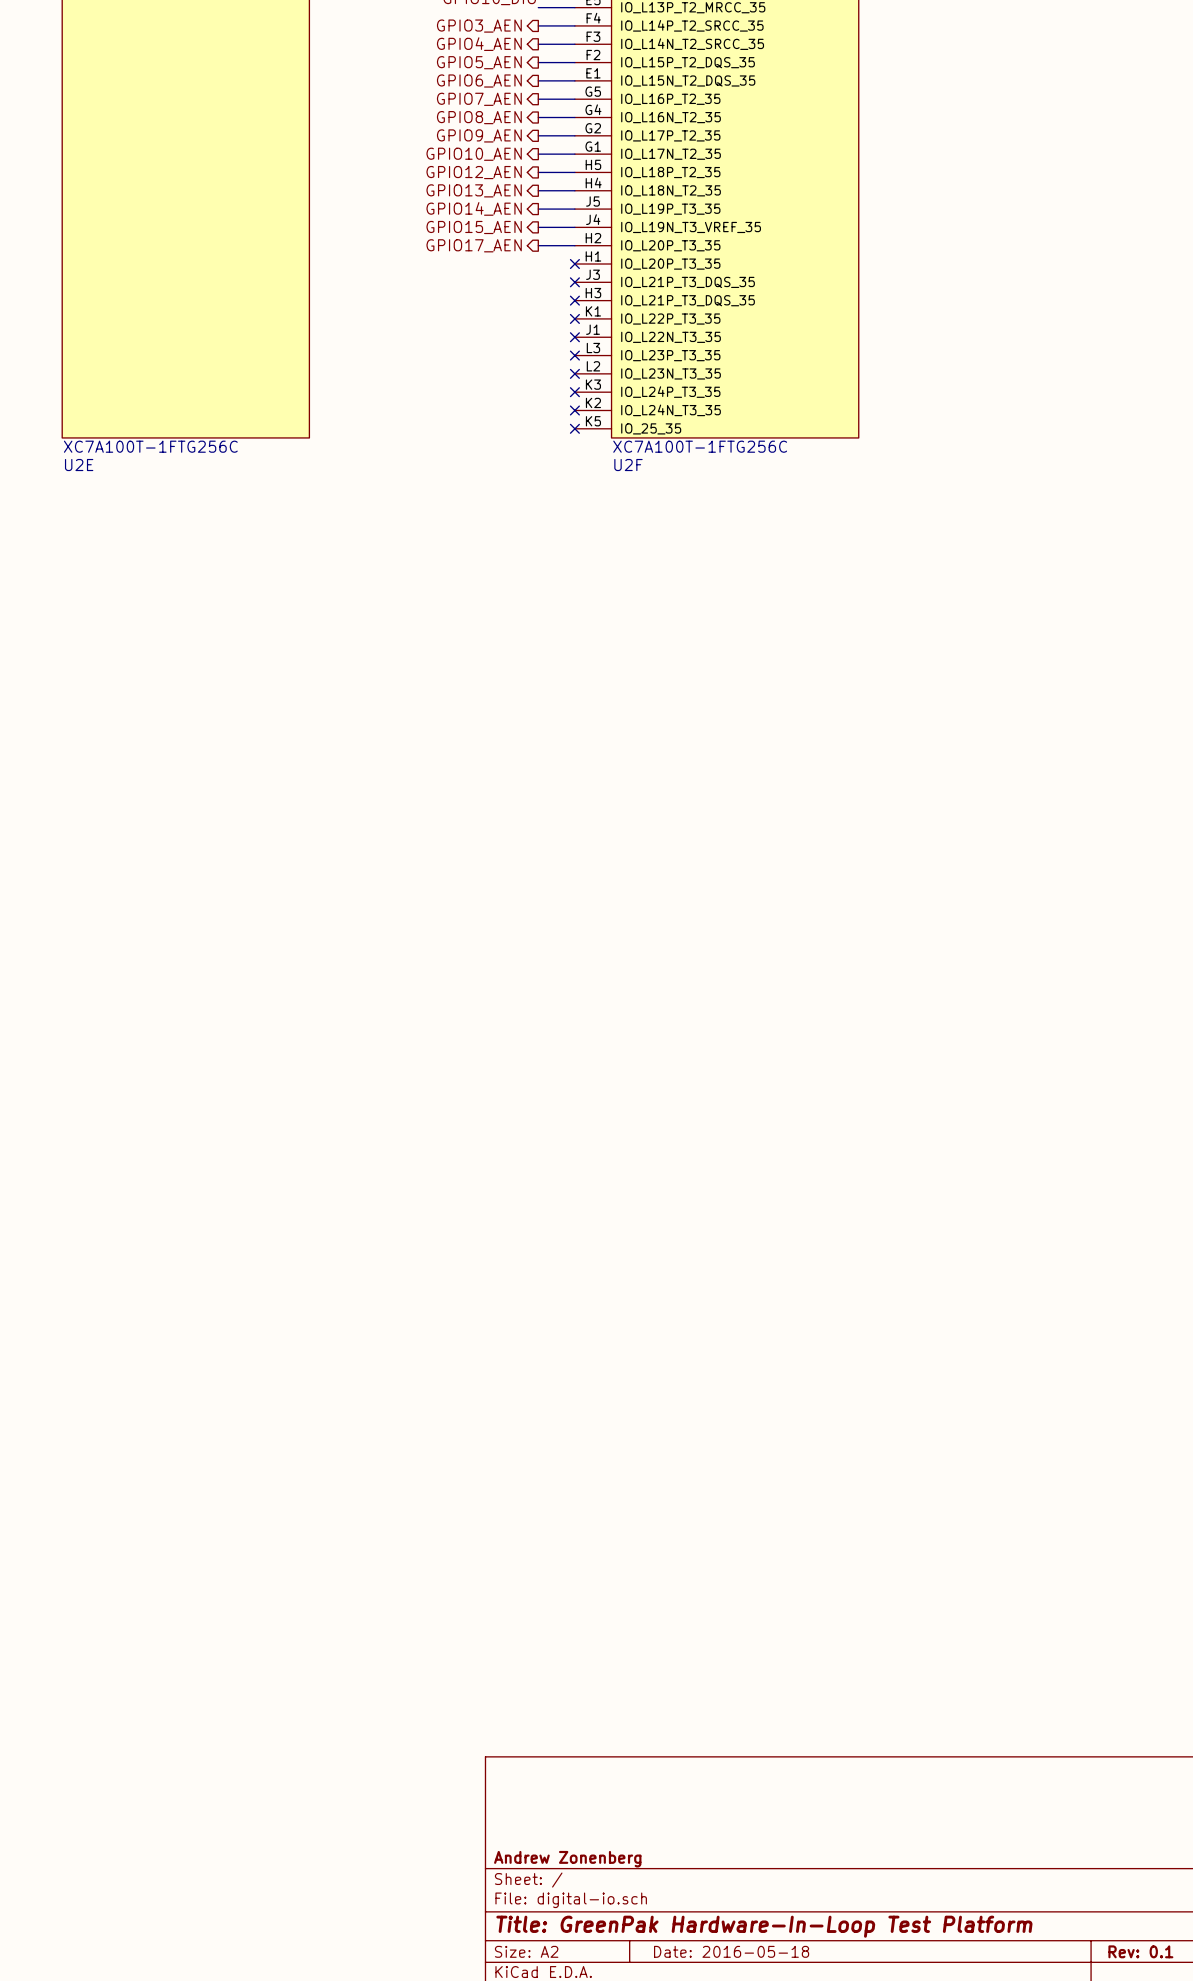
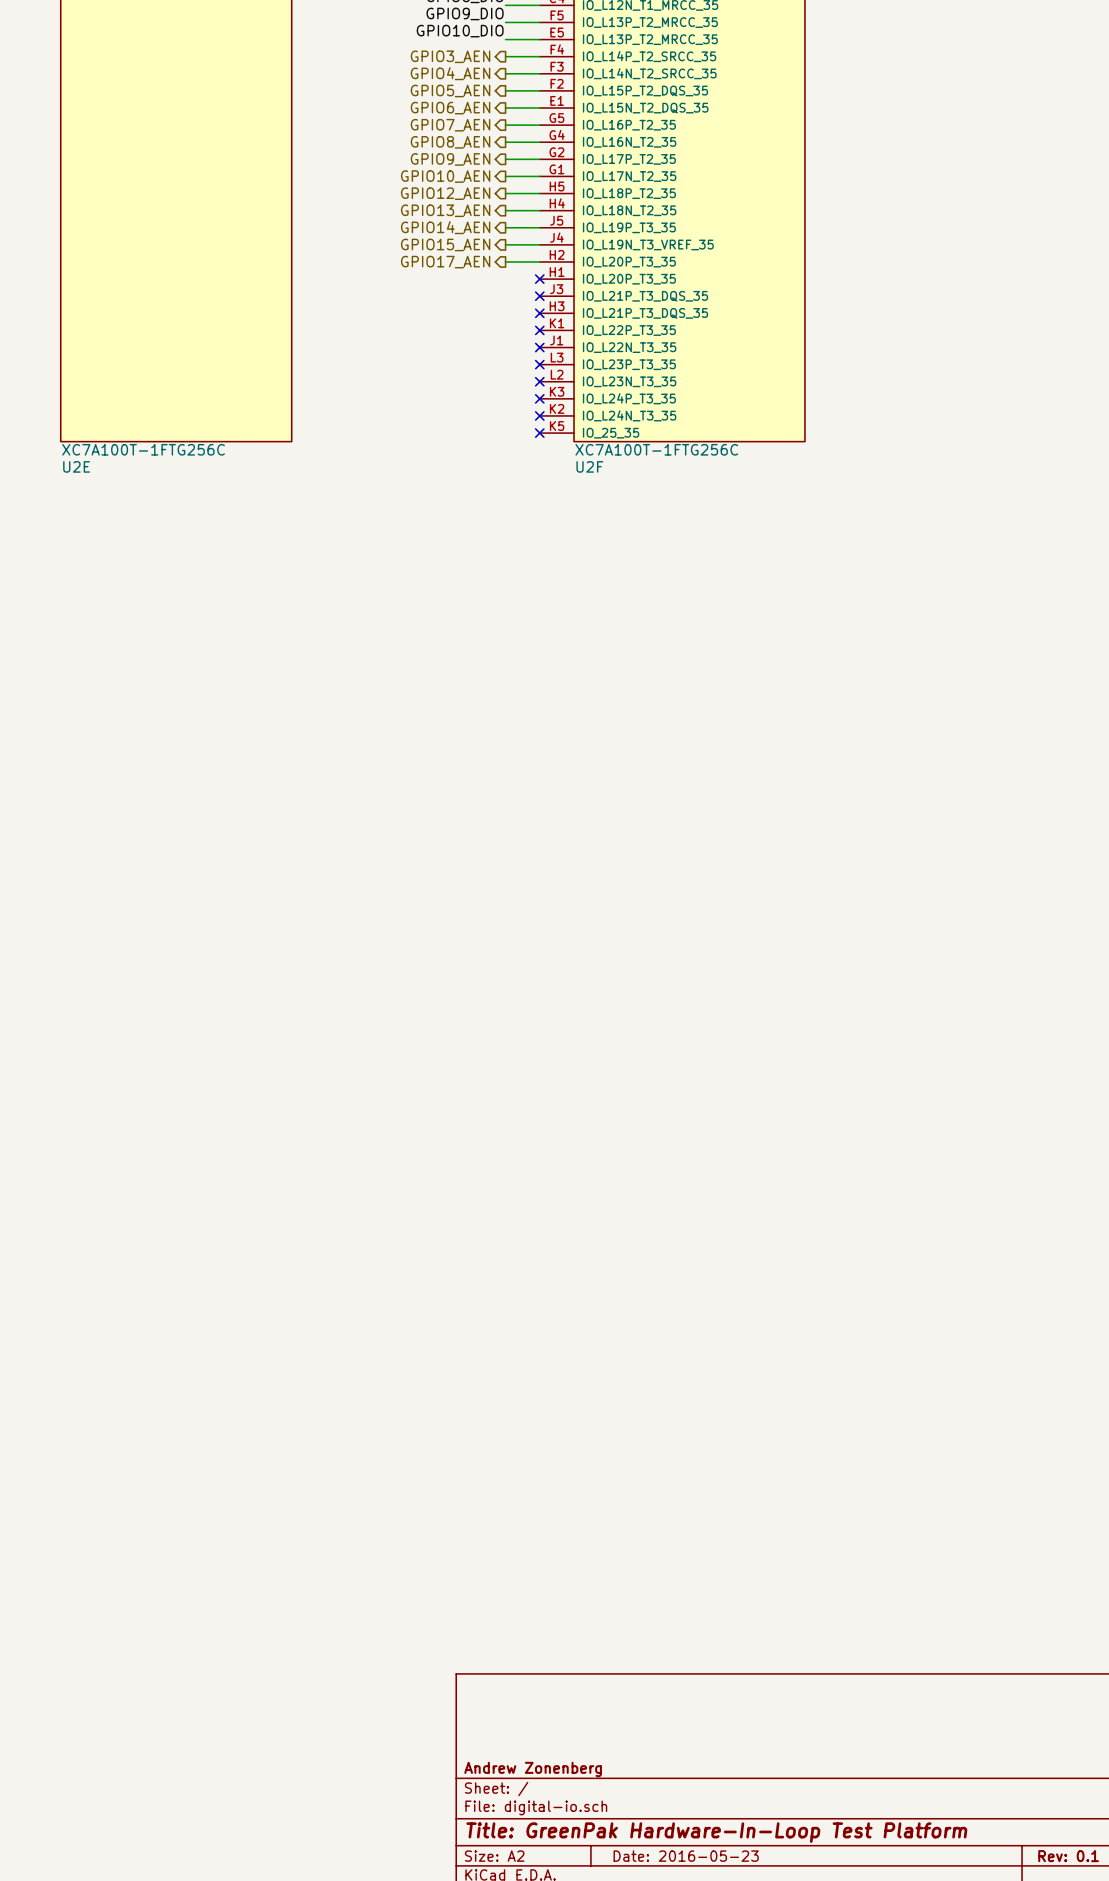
title block: Date: 2016-05-18 (731, 1951) -> Date: 2016-05-23 (686, 1856)

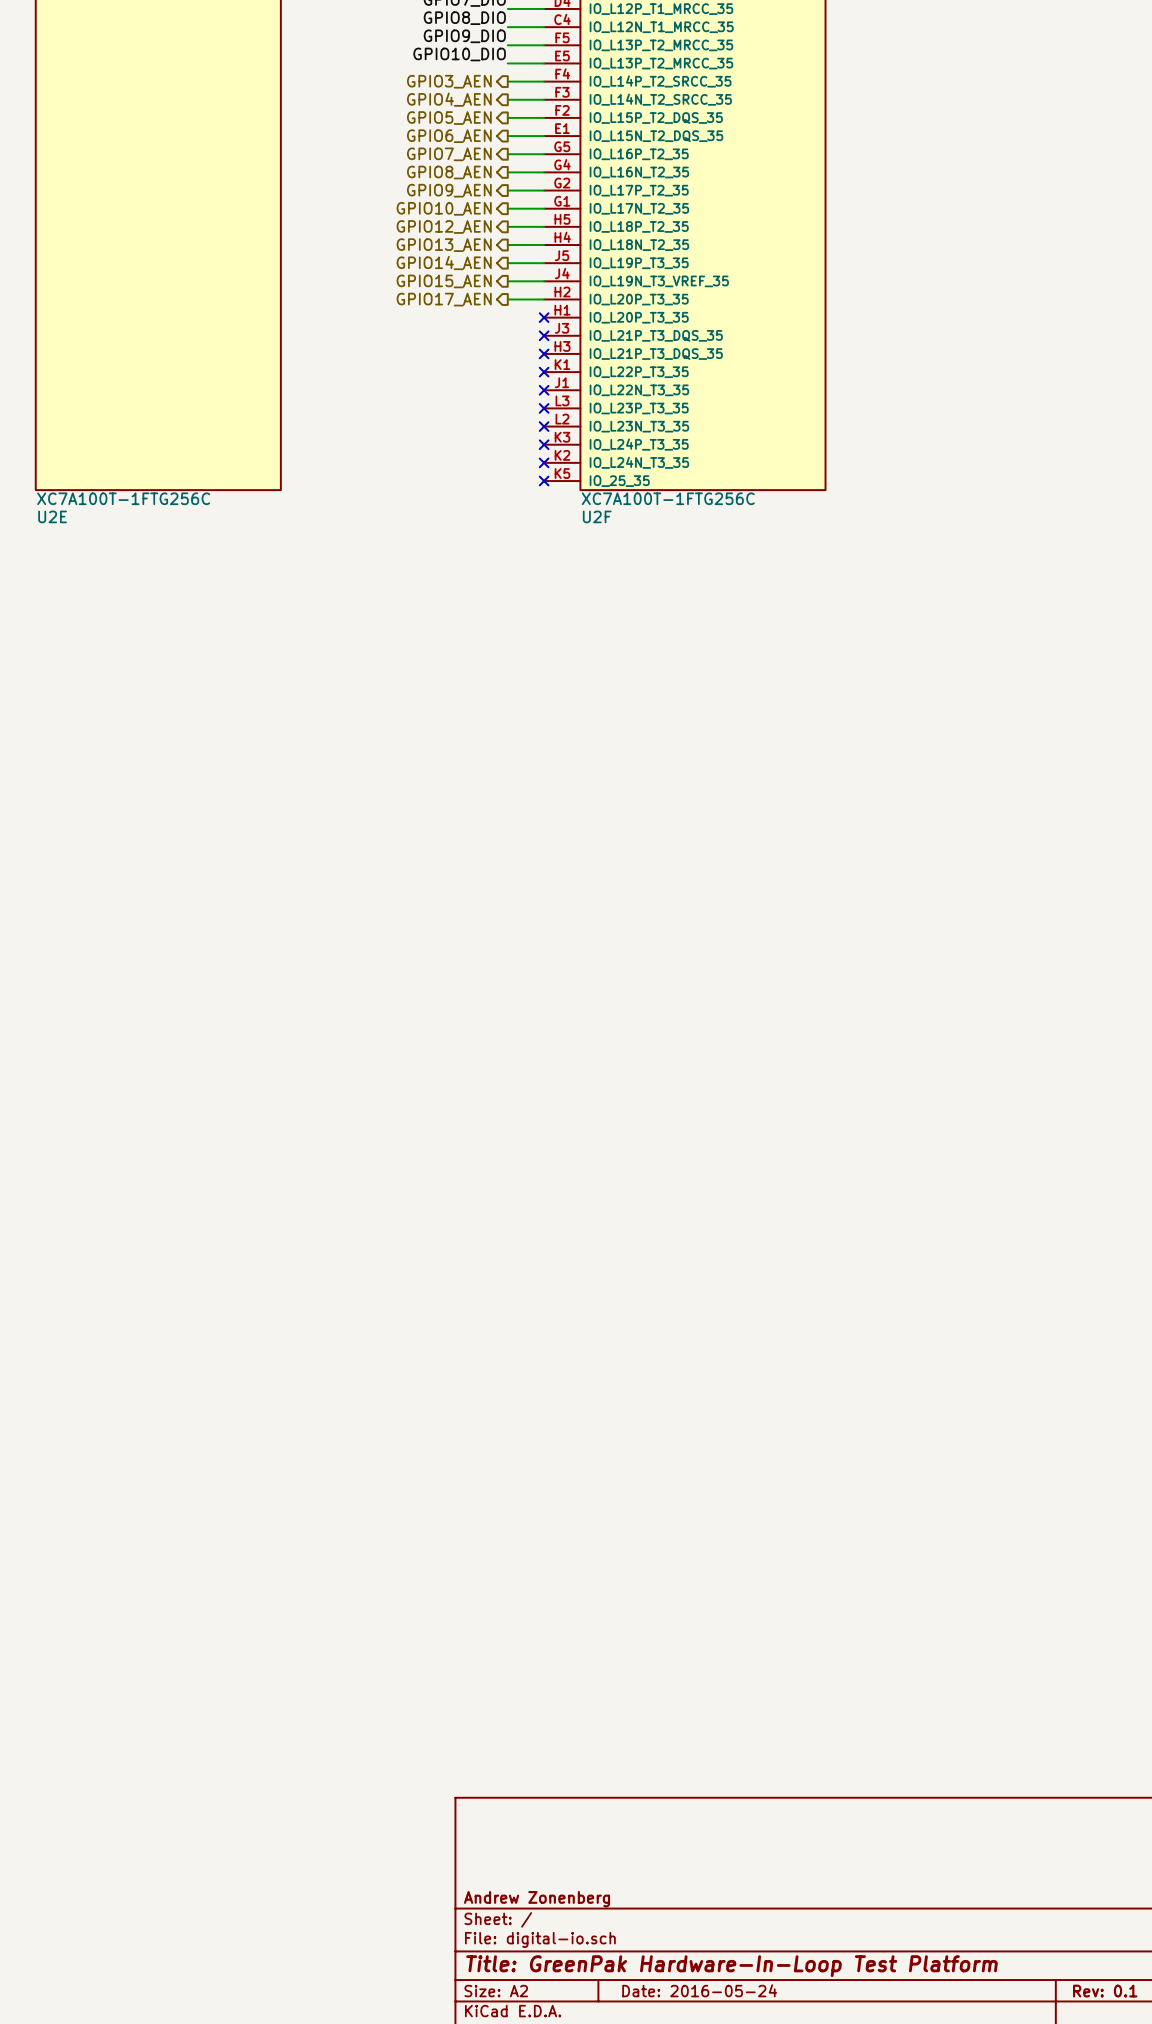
title block: Date: 2016-05-23 (686, 1856) -> Date: 2016-05-24 (699, 1990)

